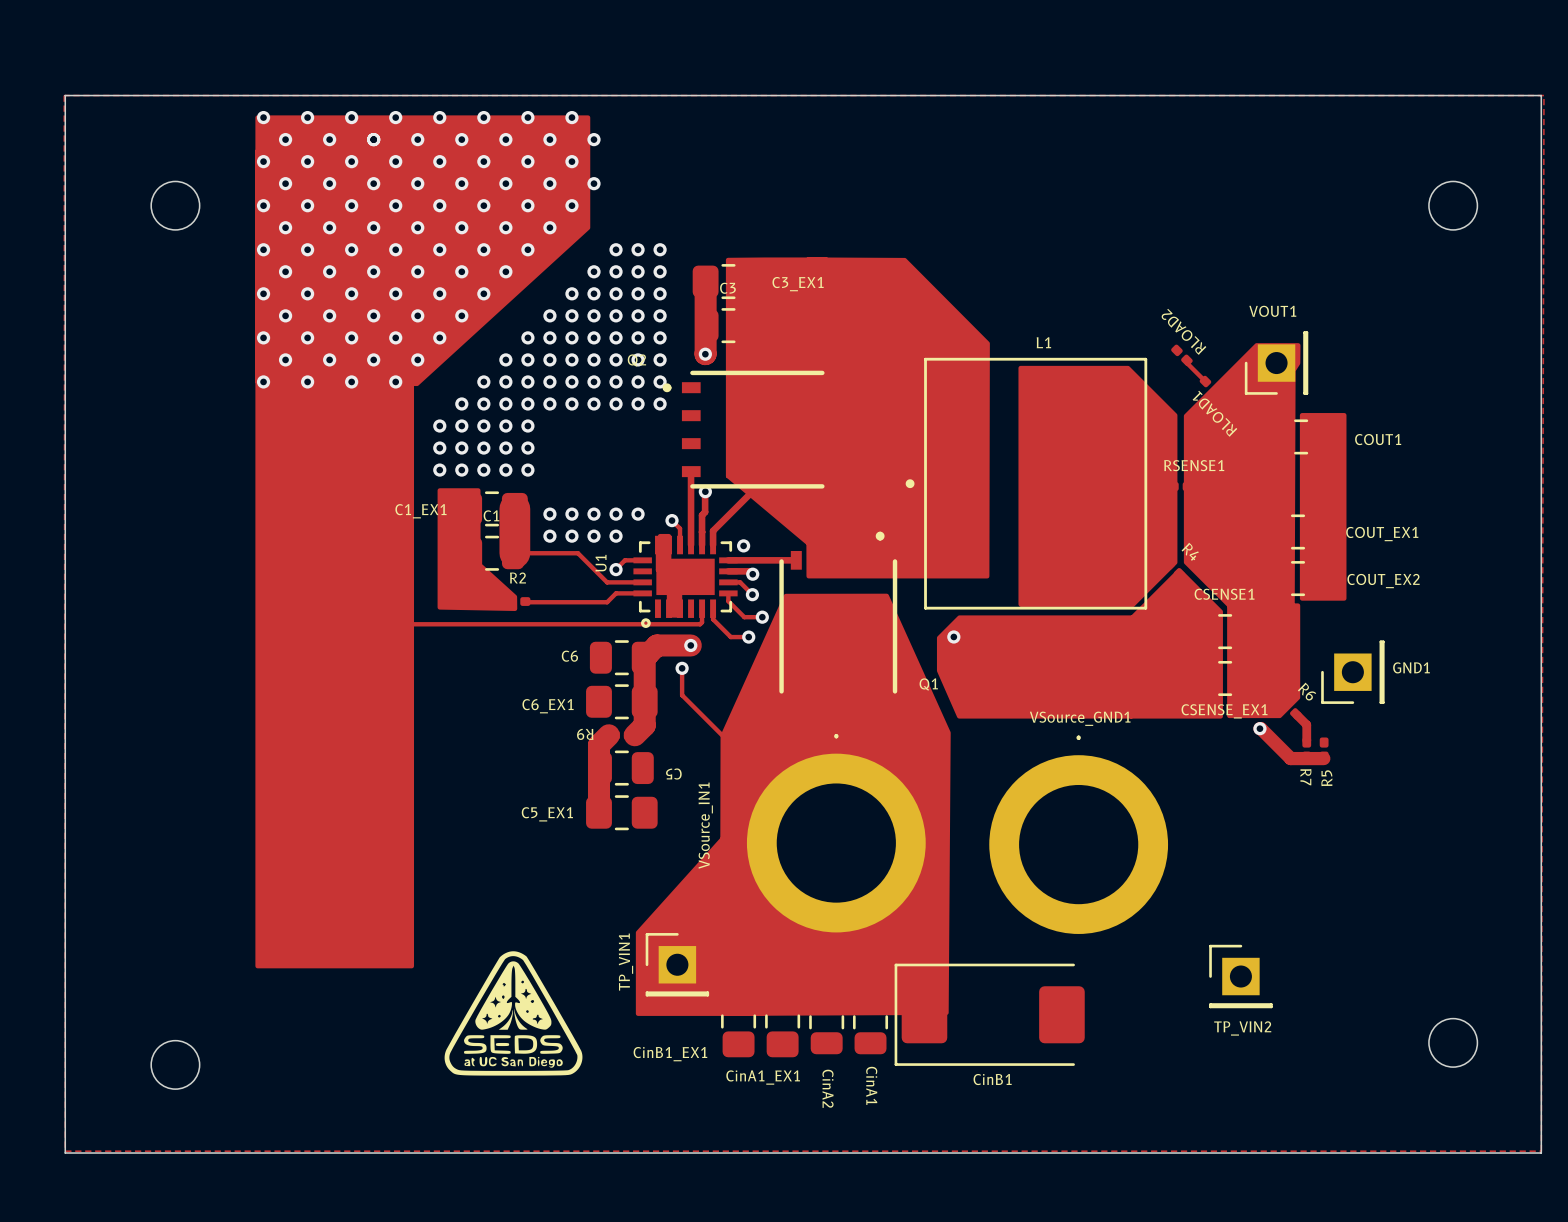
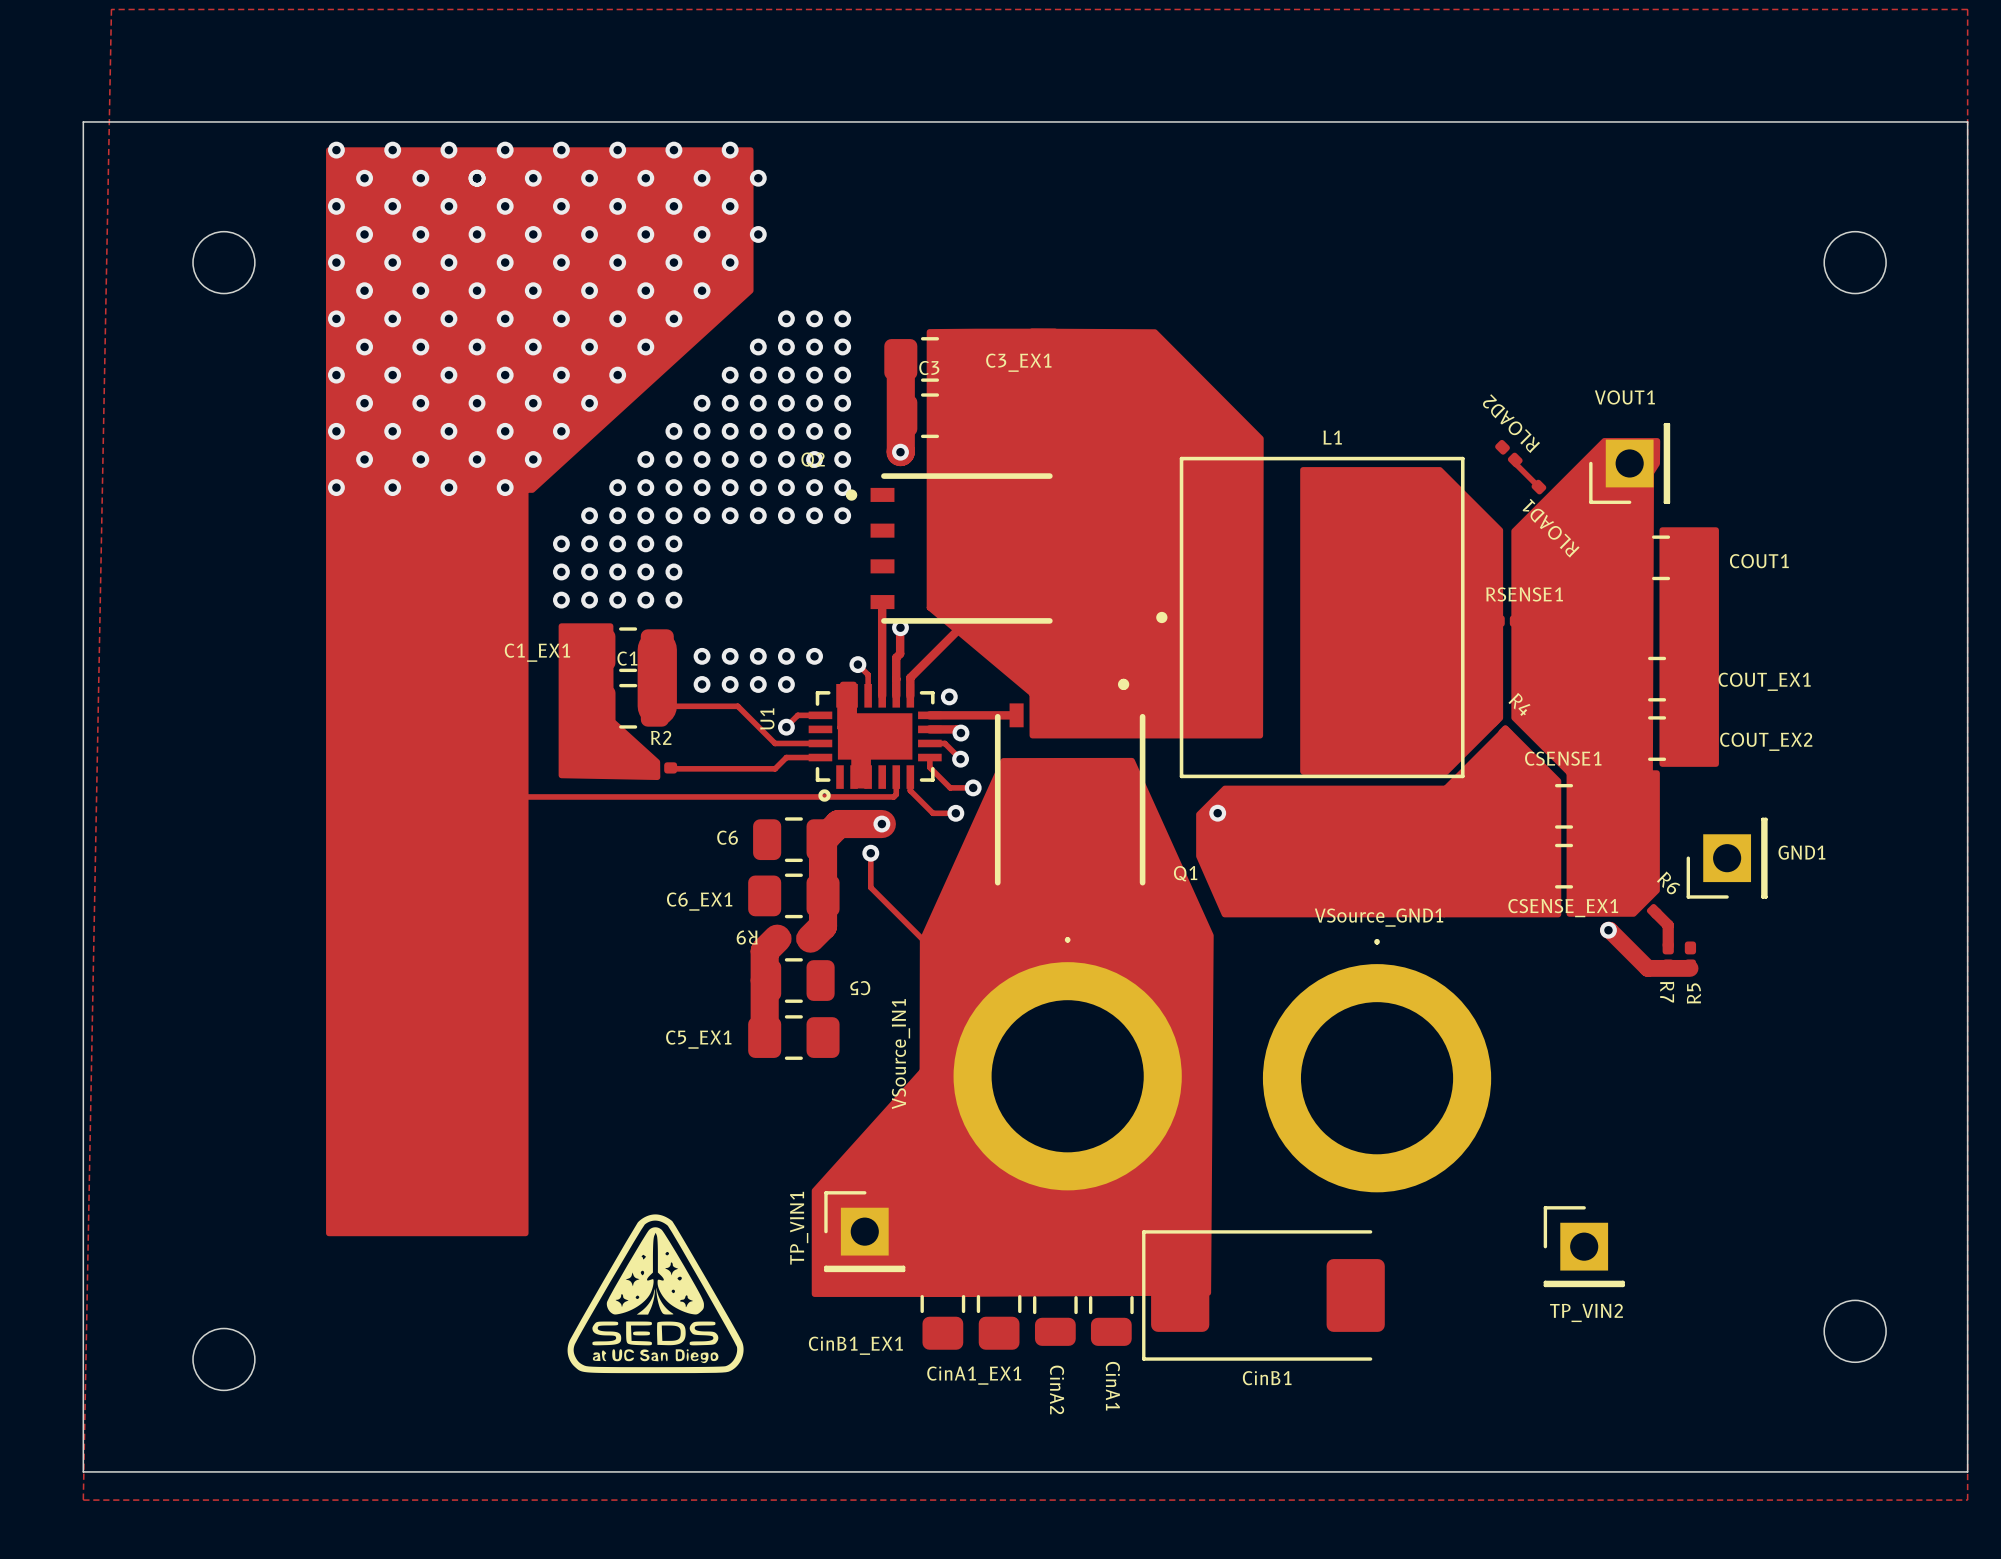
zone outline: (64, 95) (65, 1151) (1541, 1151) (1543, 95) (64, 95) -> (111, 9) (83, 1500) (1967, 1500) (1967, 9) (111, 9)

